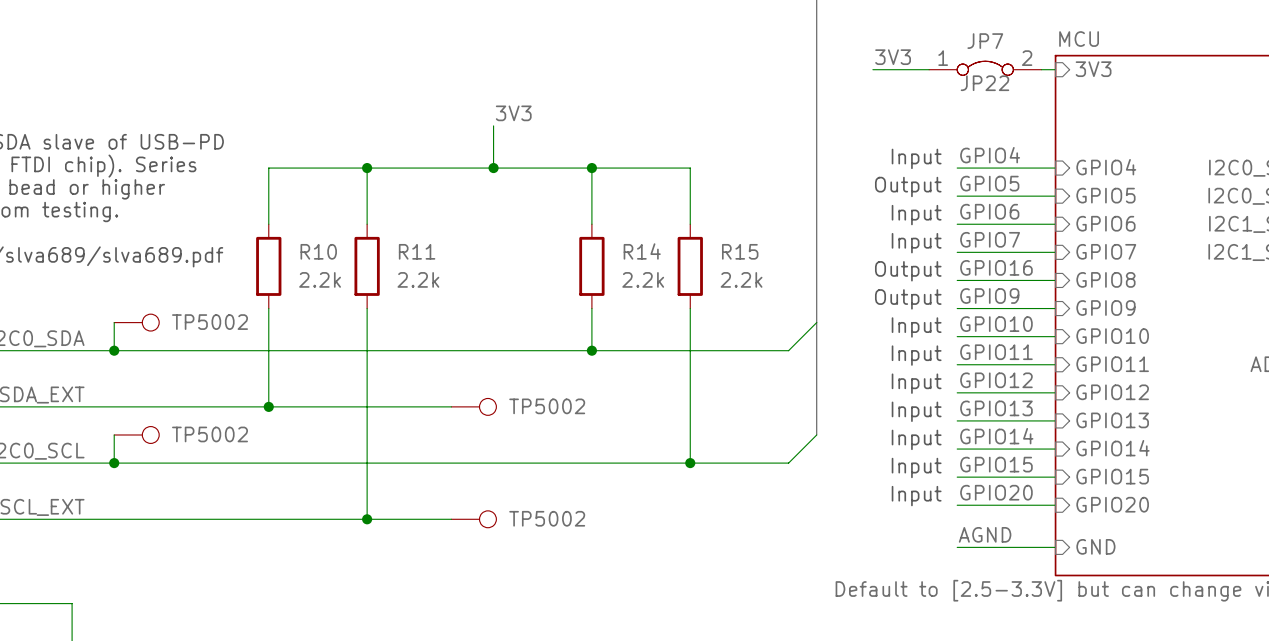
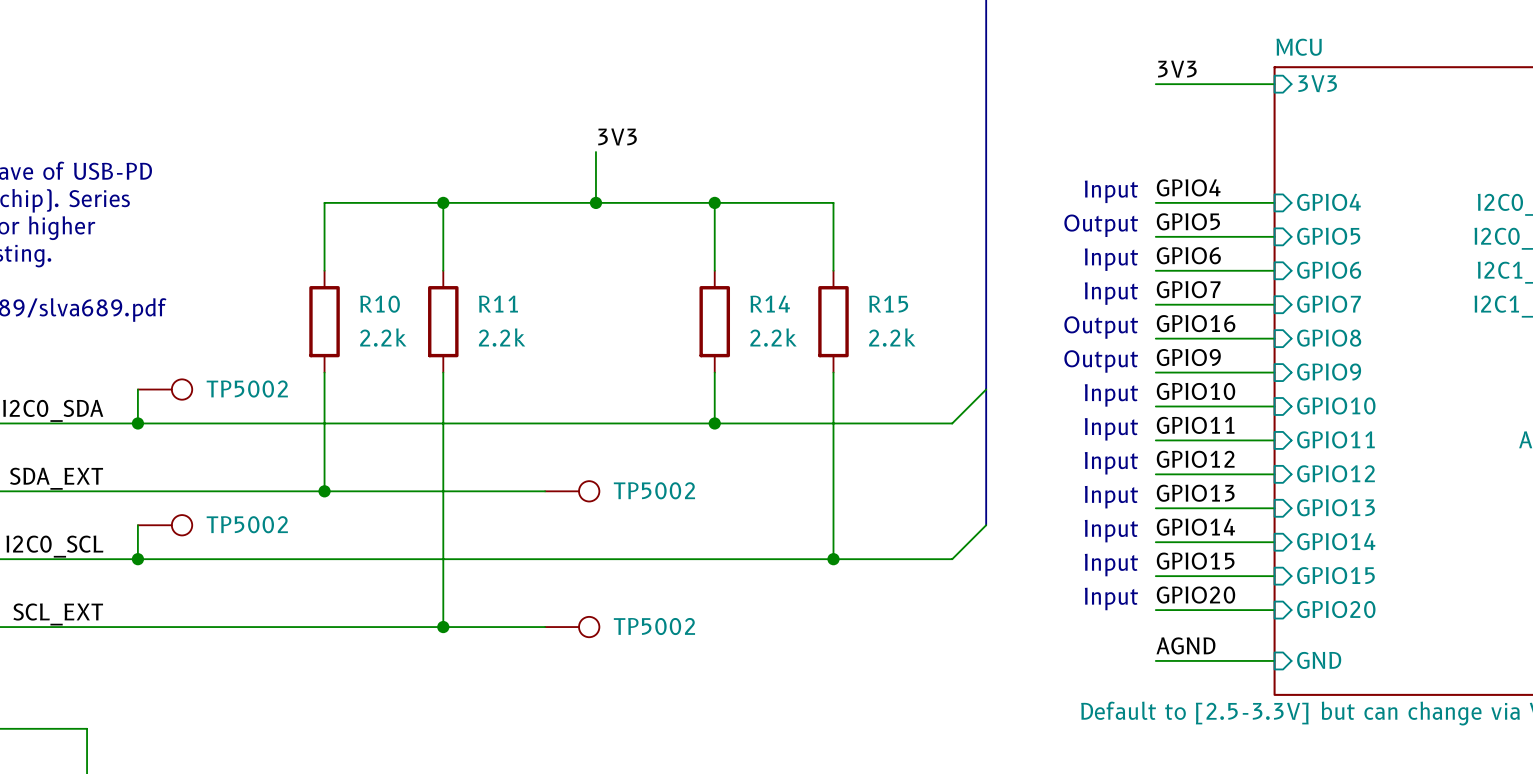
label position: 3V3 (893, 57) -> 3V3 (1177, 69)
JP22: (985, 68) -> none
JP7: (985, 68) -> none
wire: (872, 69) (929, 69) -> none
wire: none -> (1155, 84) (1257, 84)

